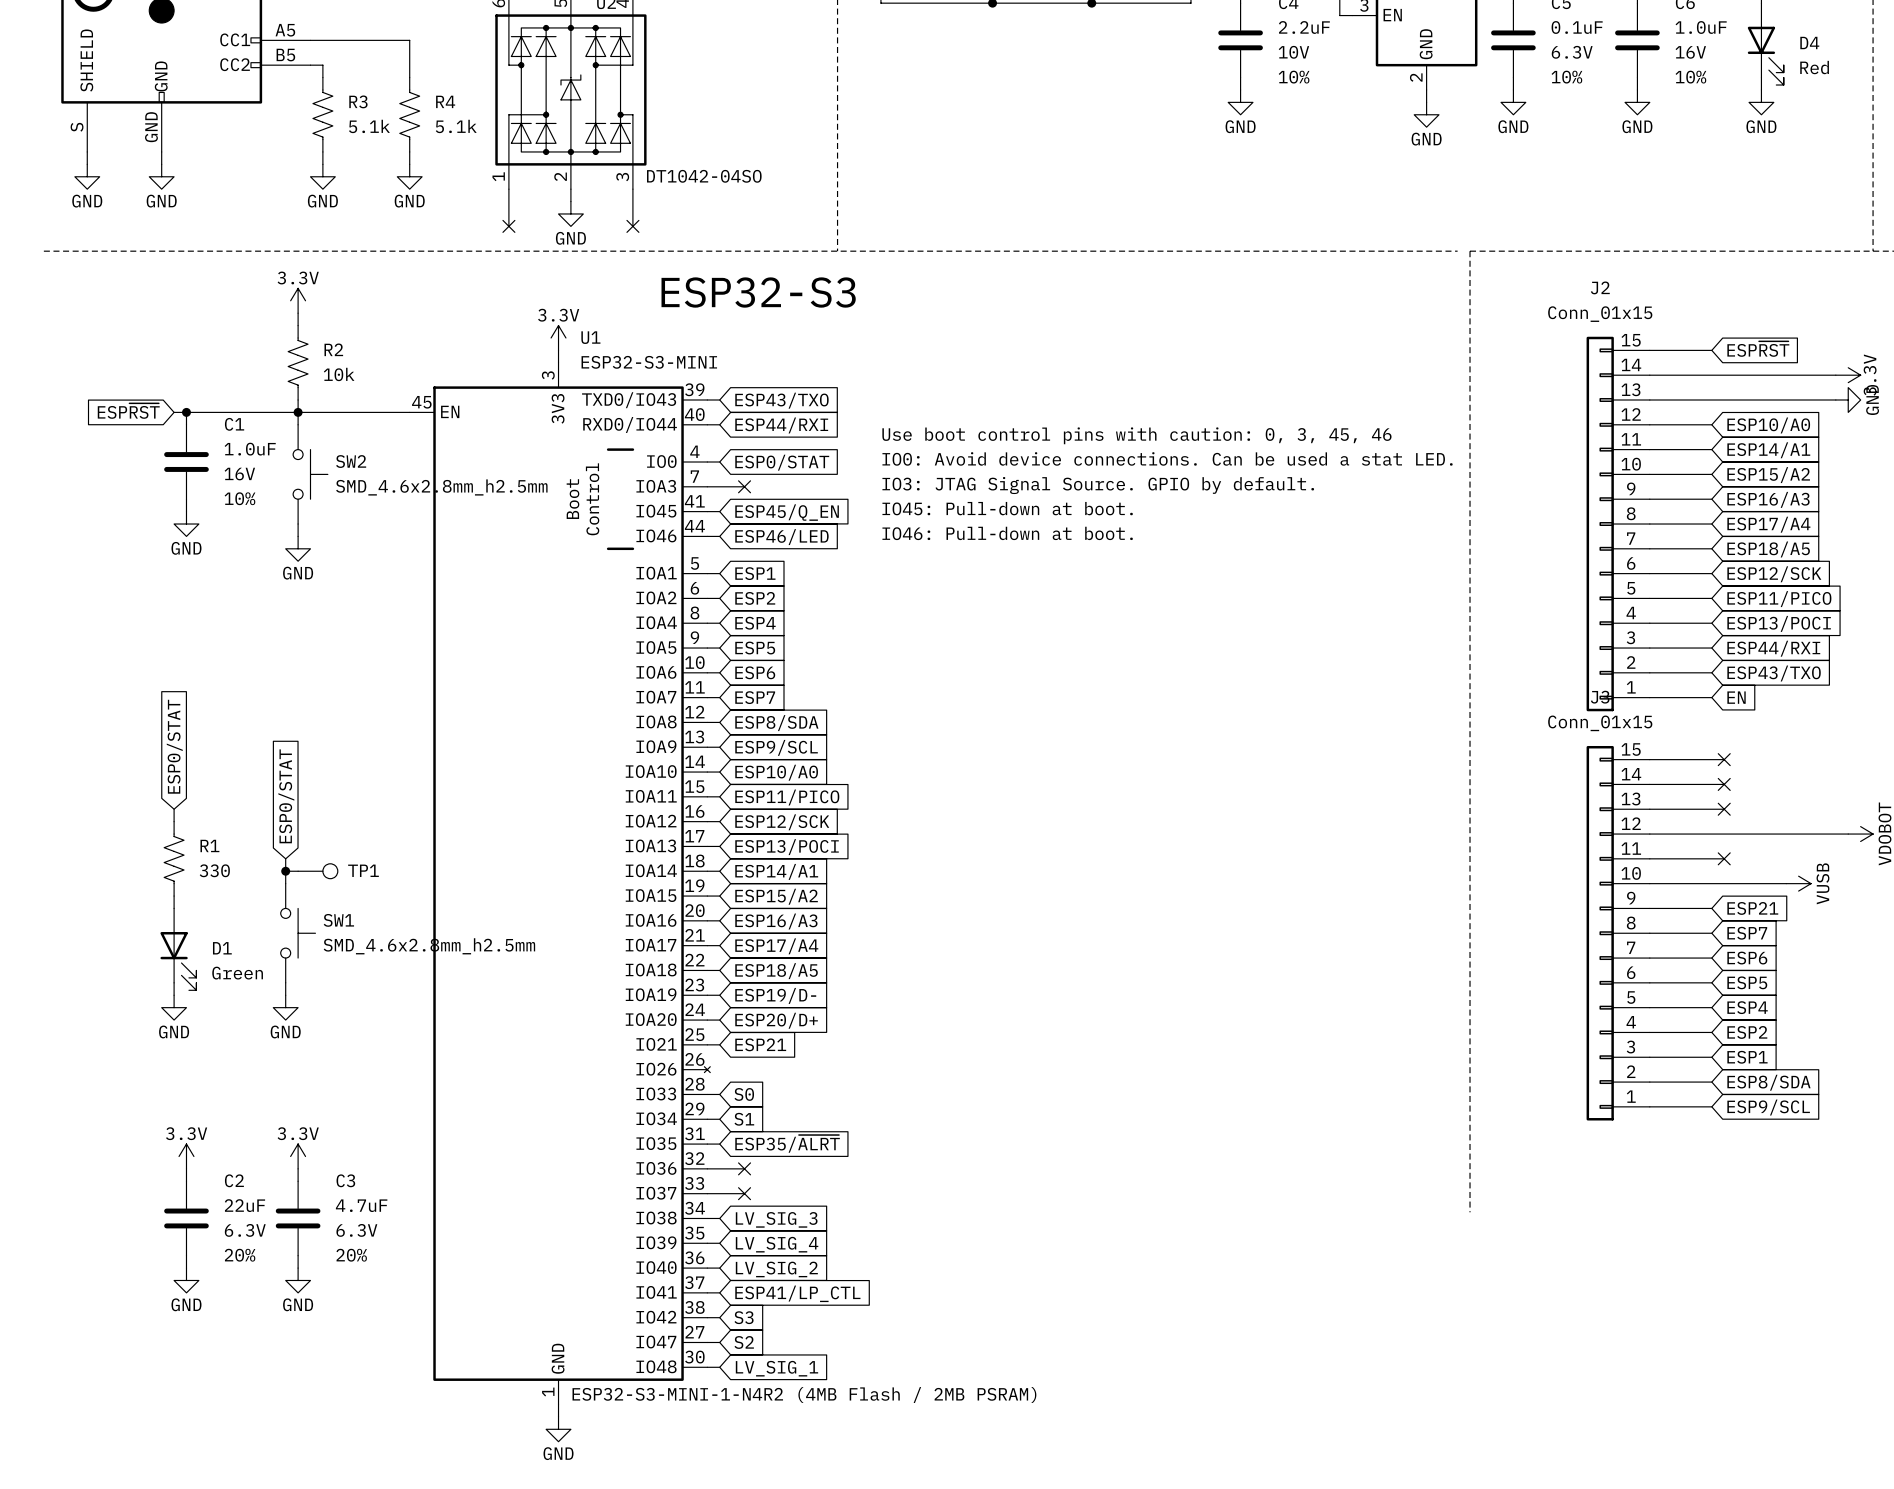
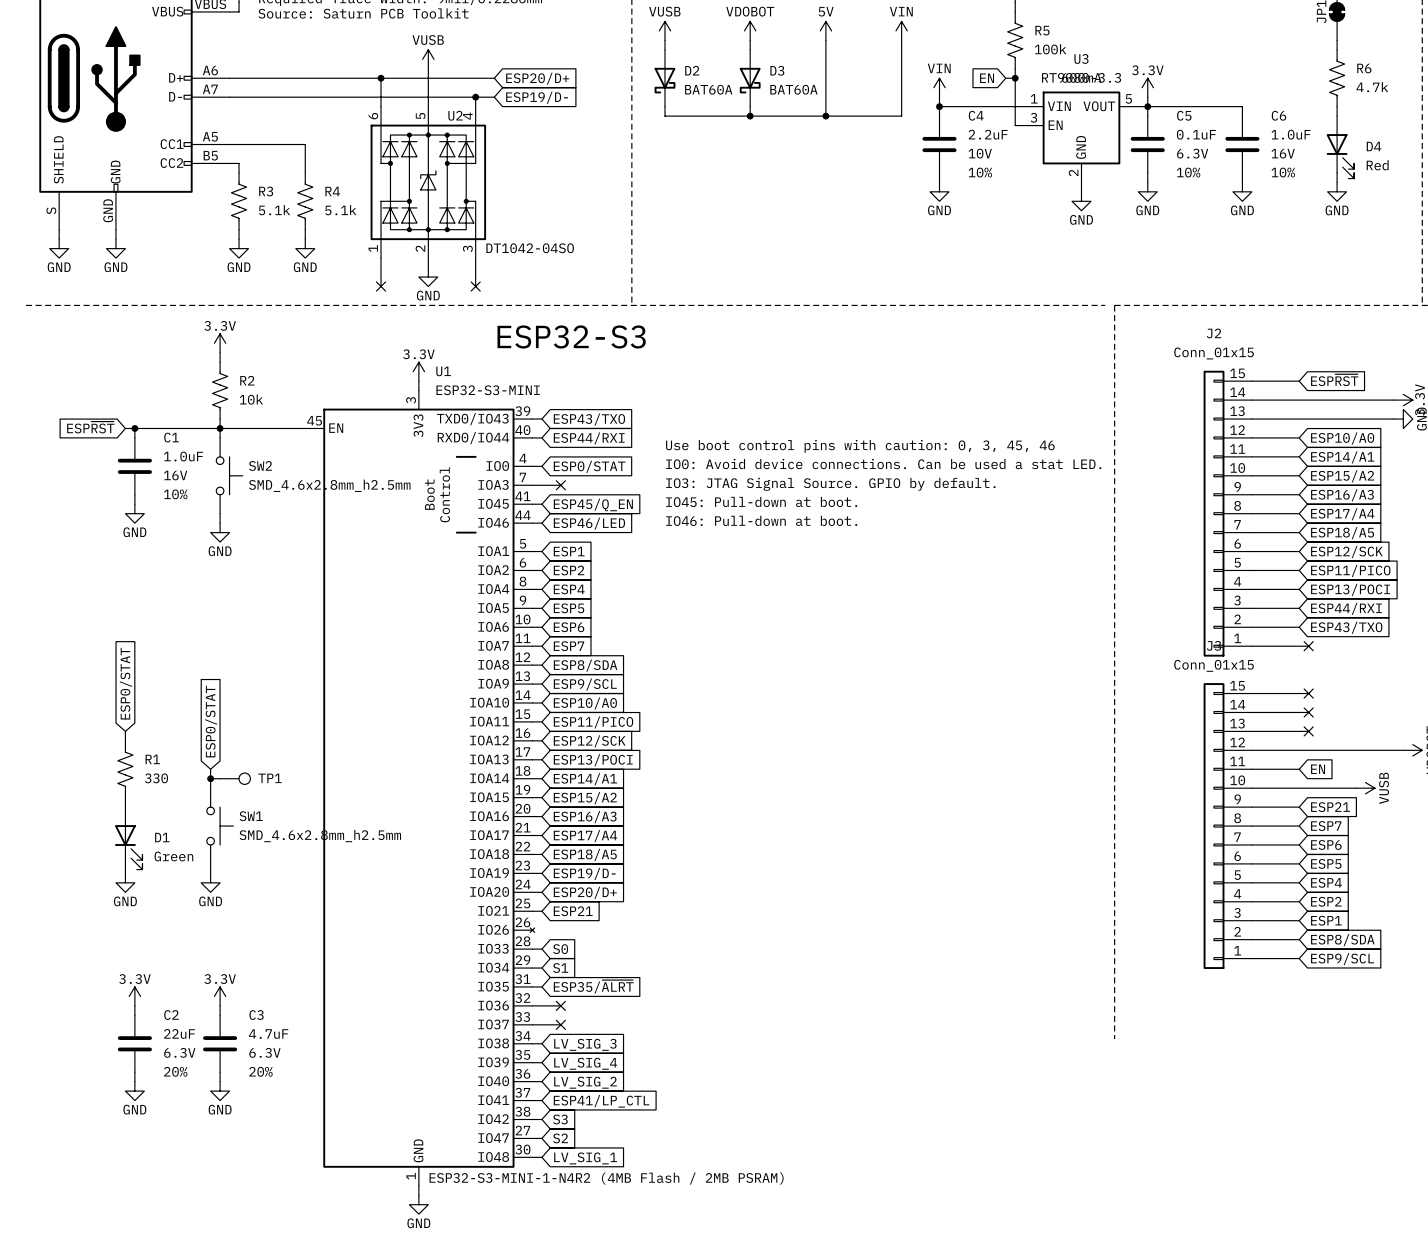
no-connect mark: none -> (1308, 646)
global label position: EN (1736, 697) -> EN (1318, 769)
wire: (1711, 858) (1724, 858) -> (1299, 646) (1308, 646)
no-connect mark: (1724, 858) -> none

